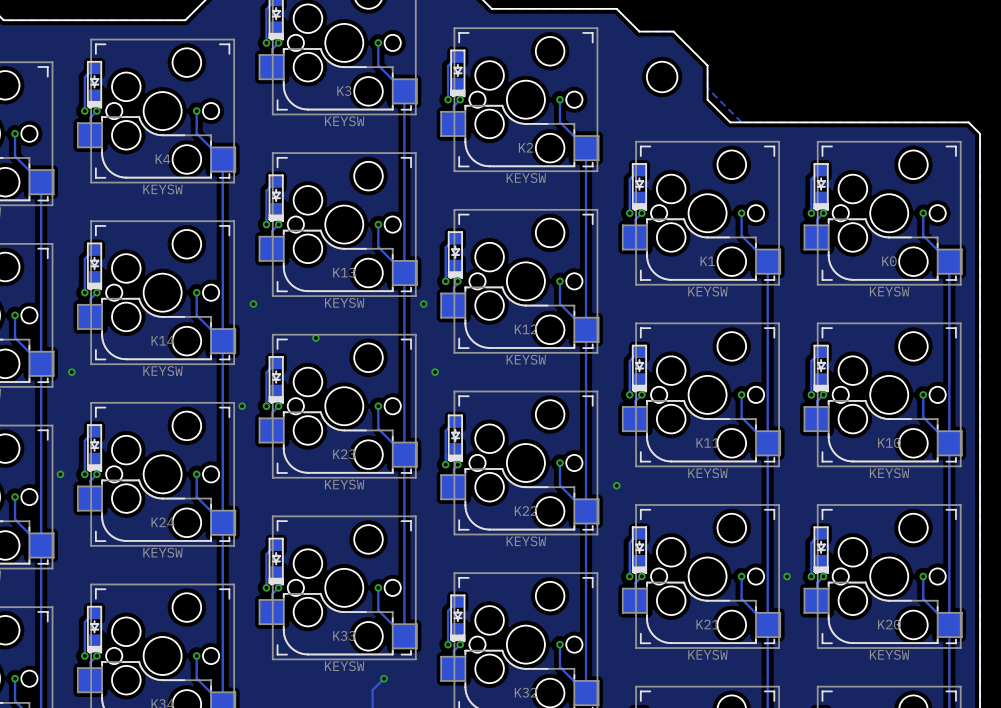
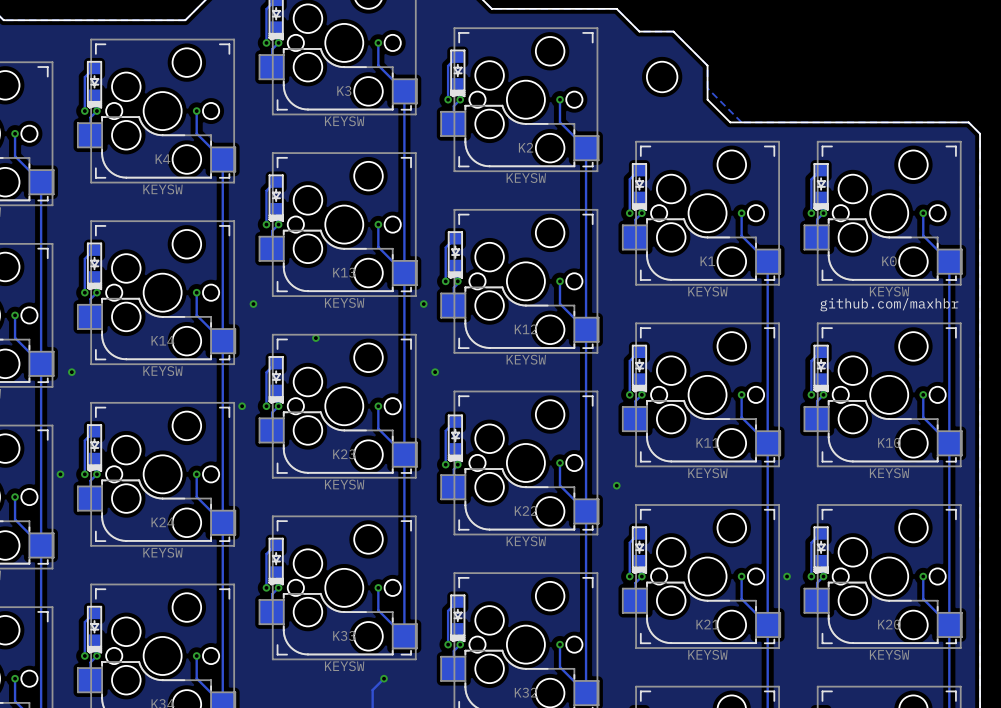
text: none -> github.com/maxhbr (889, 304)

